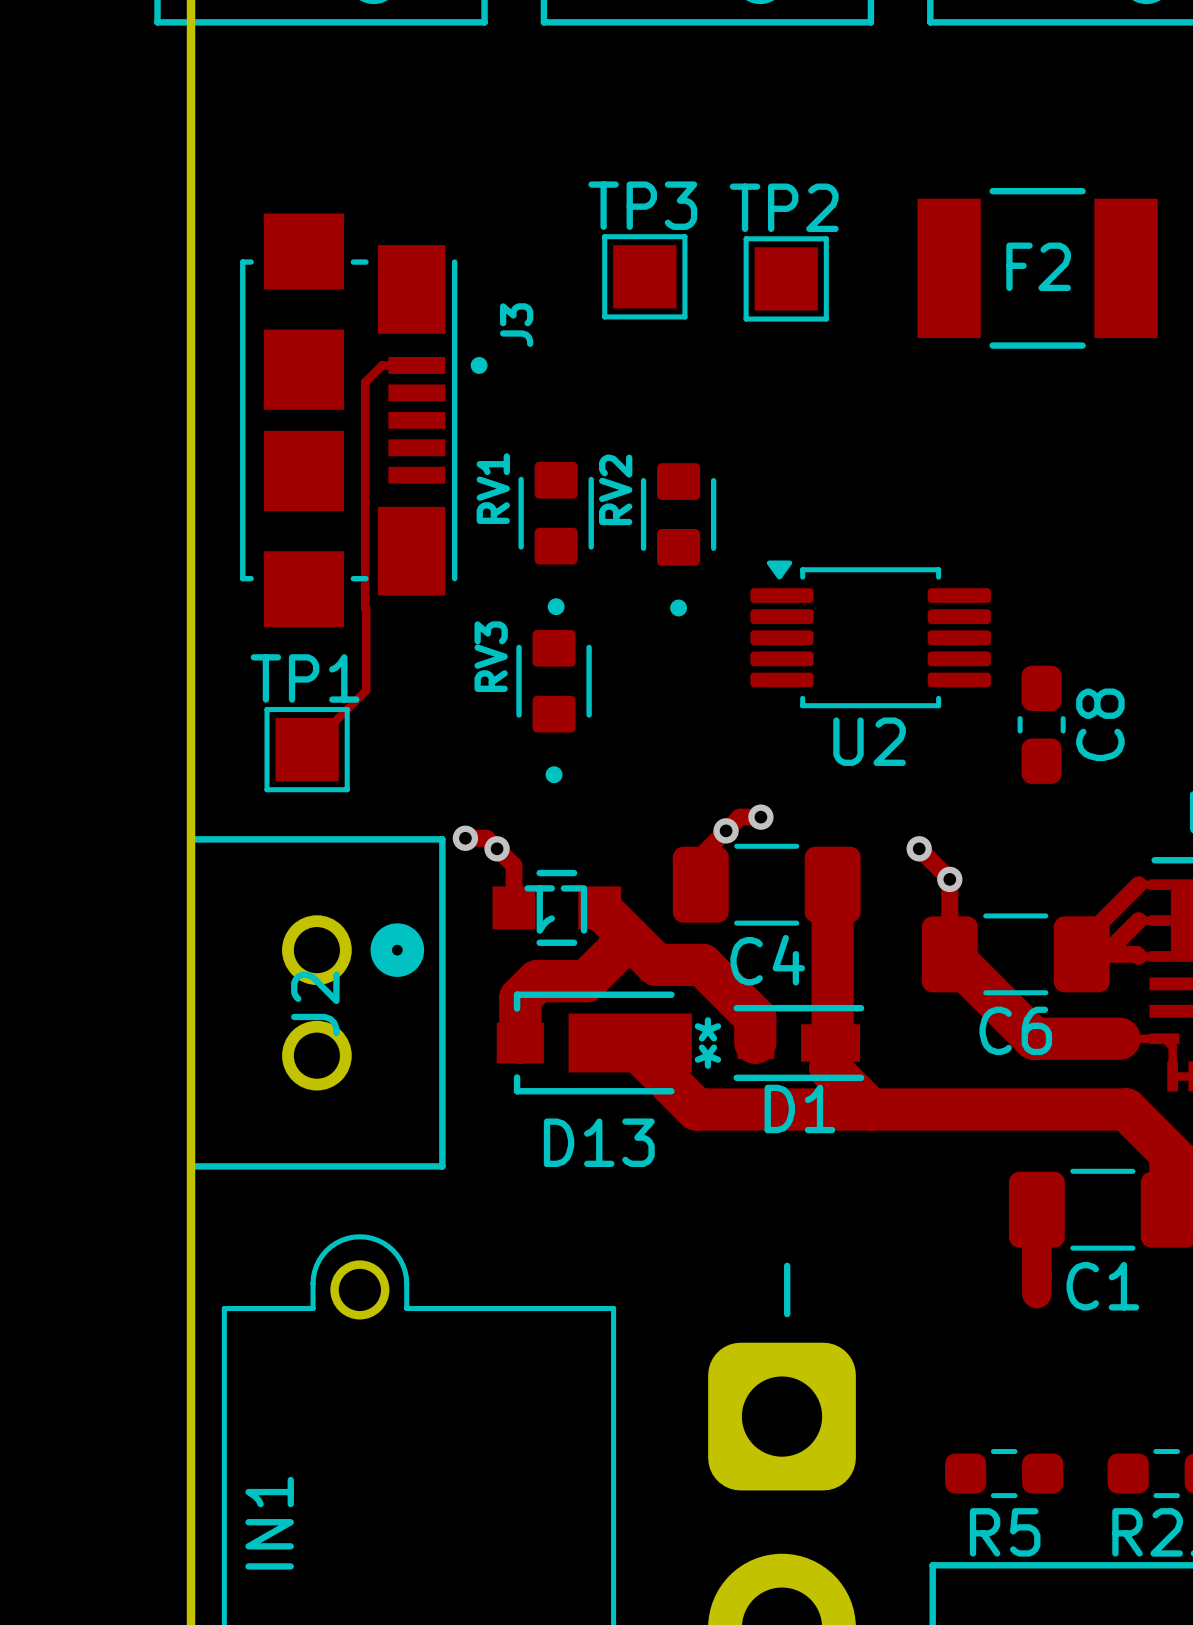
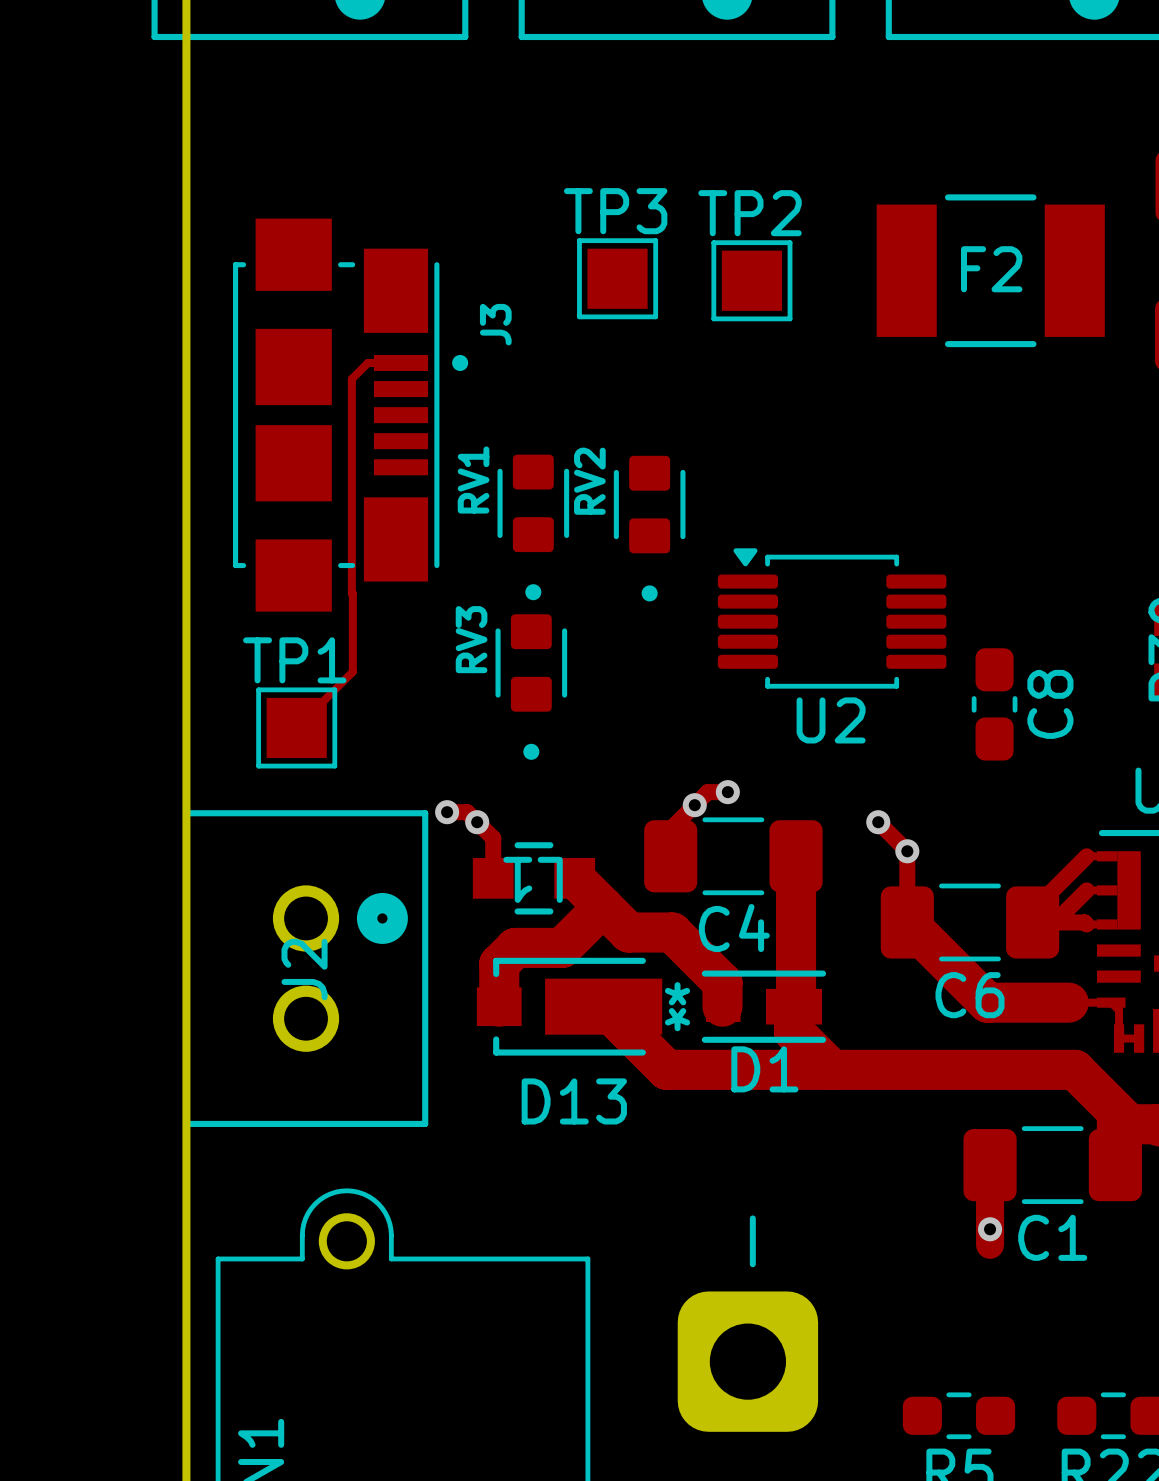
via: none -> (990, 1229)

